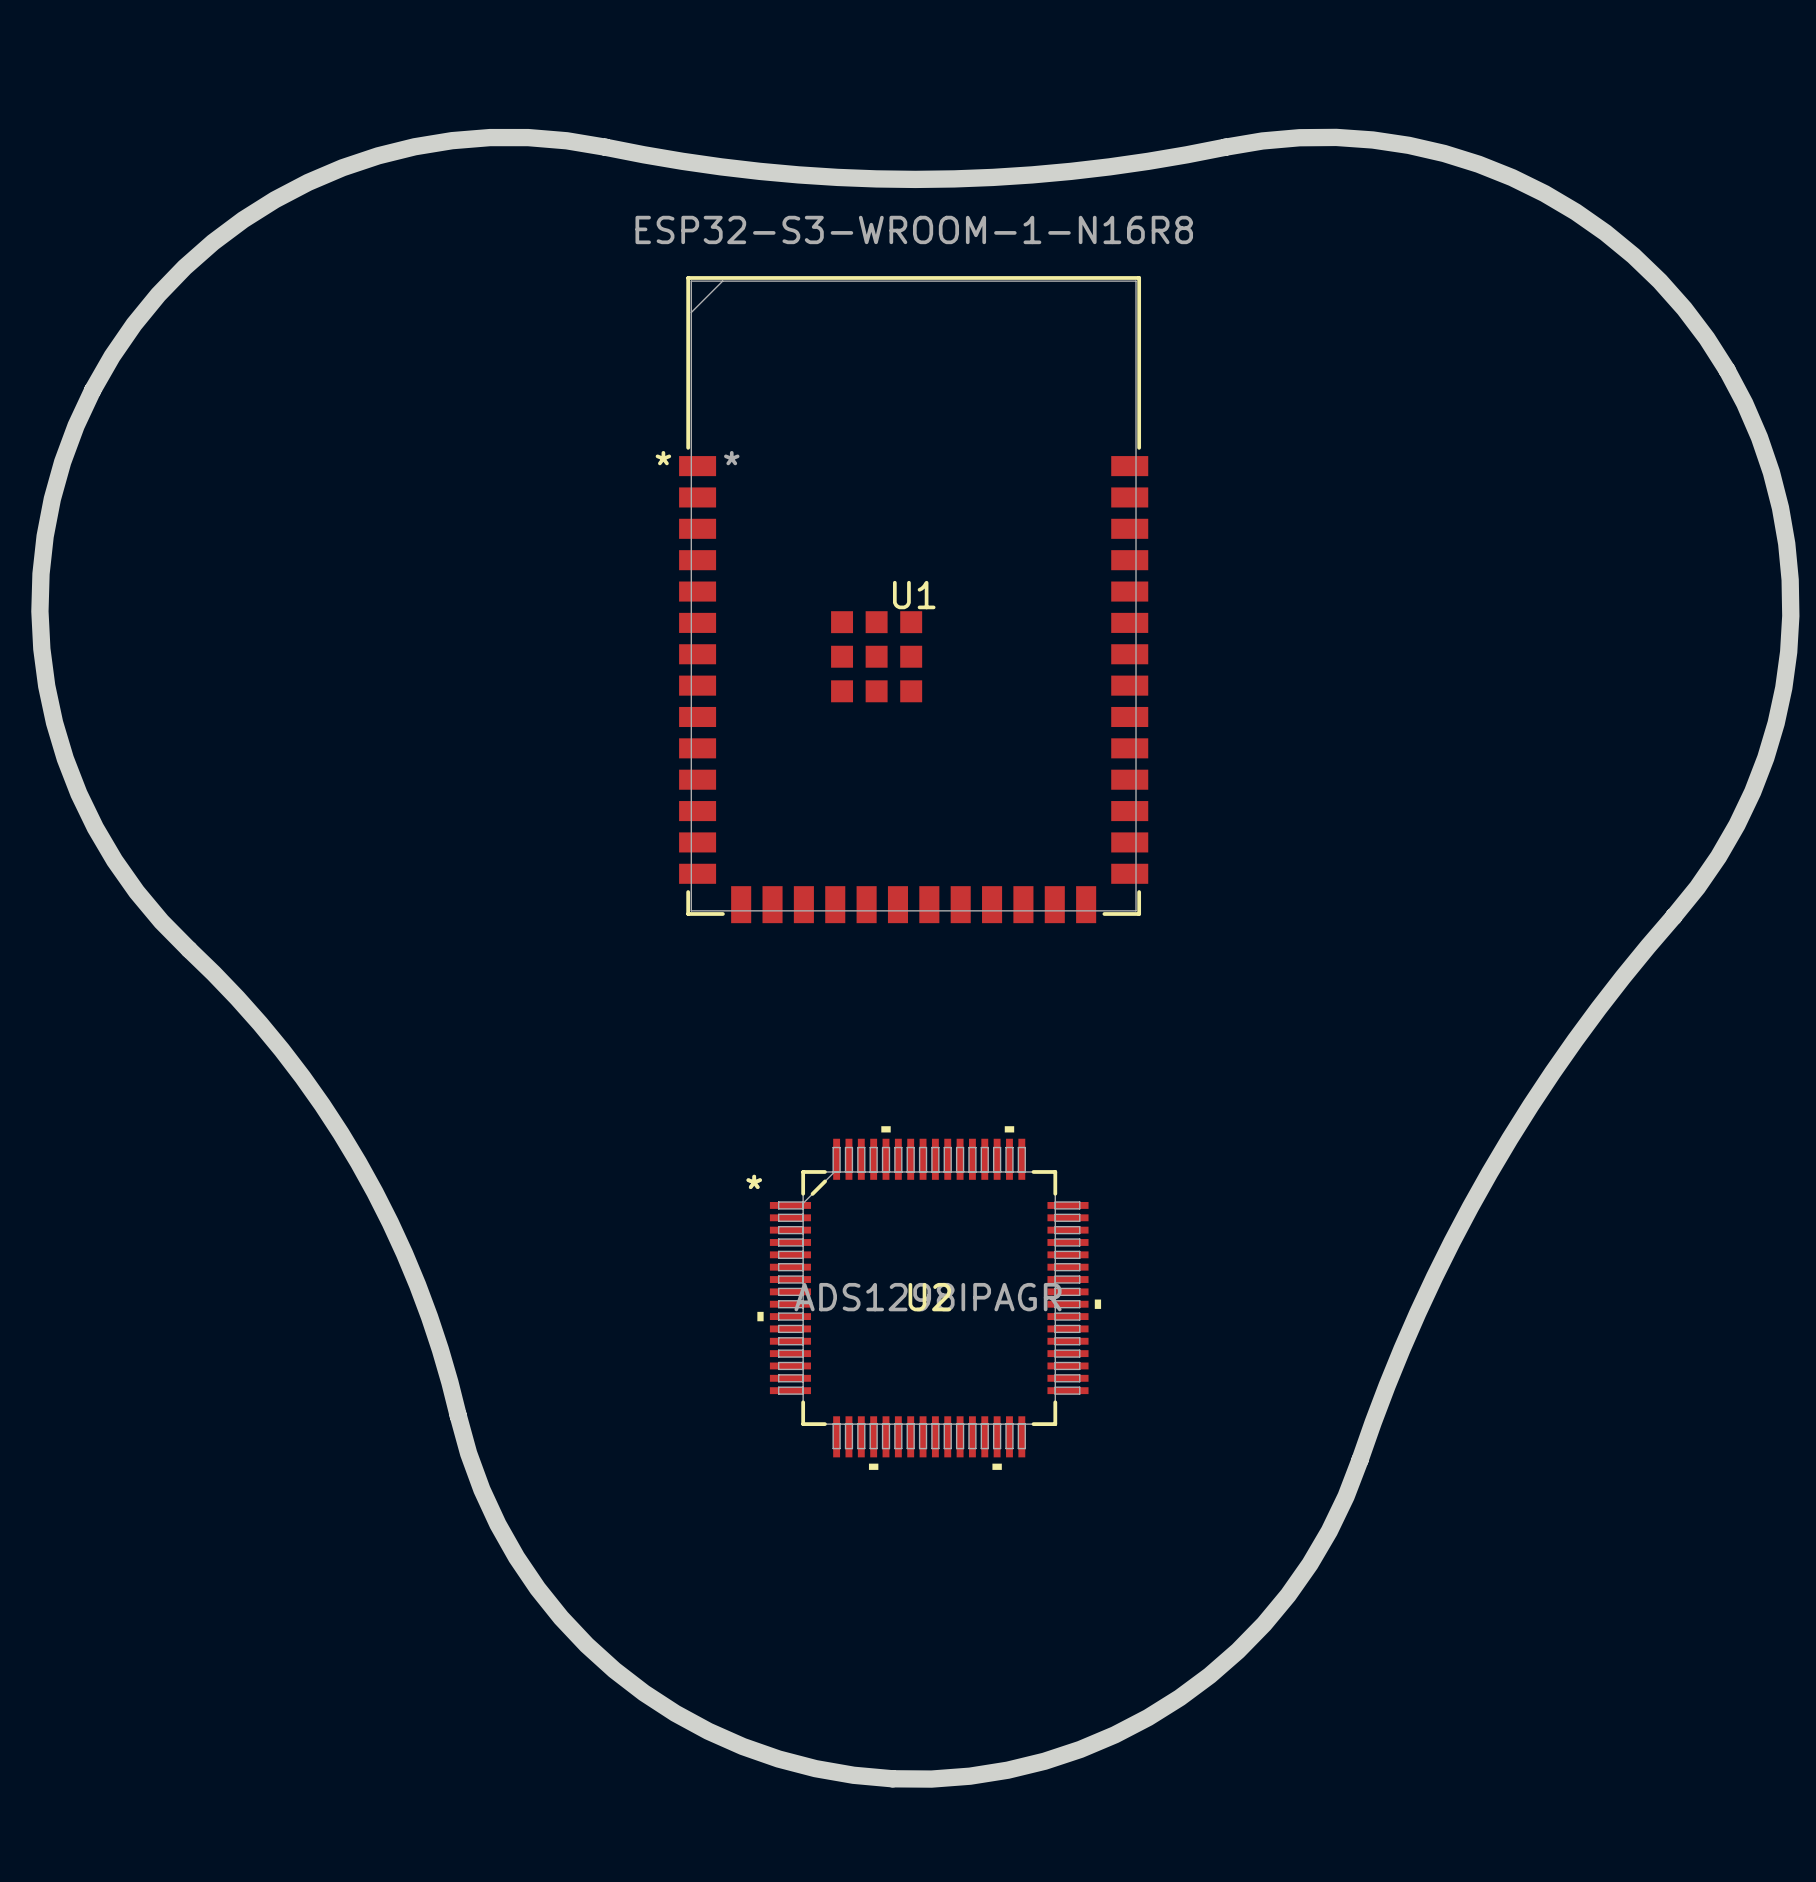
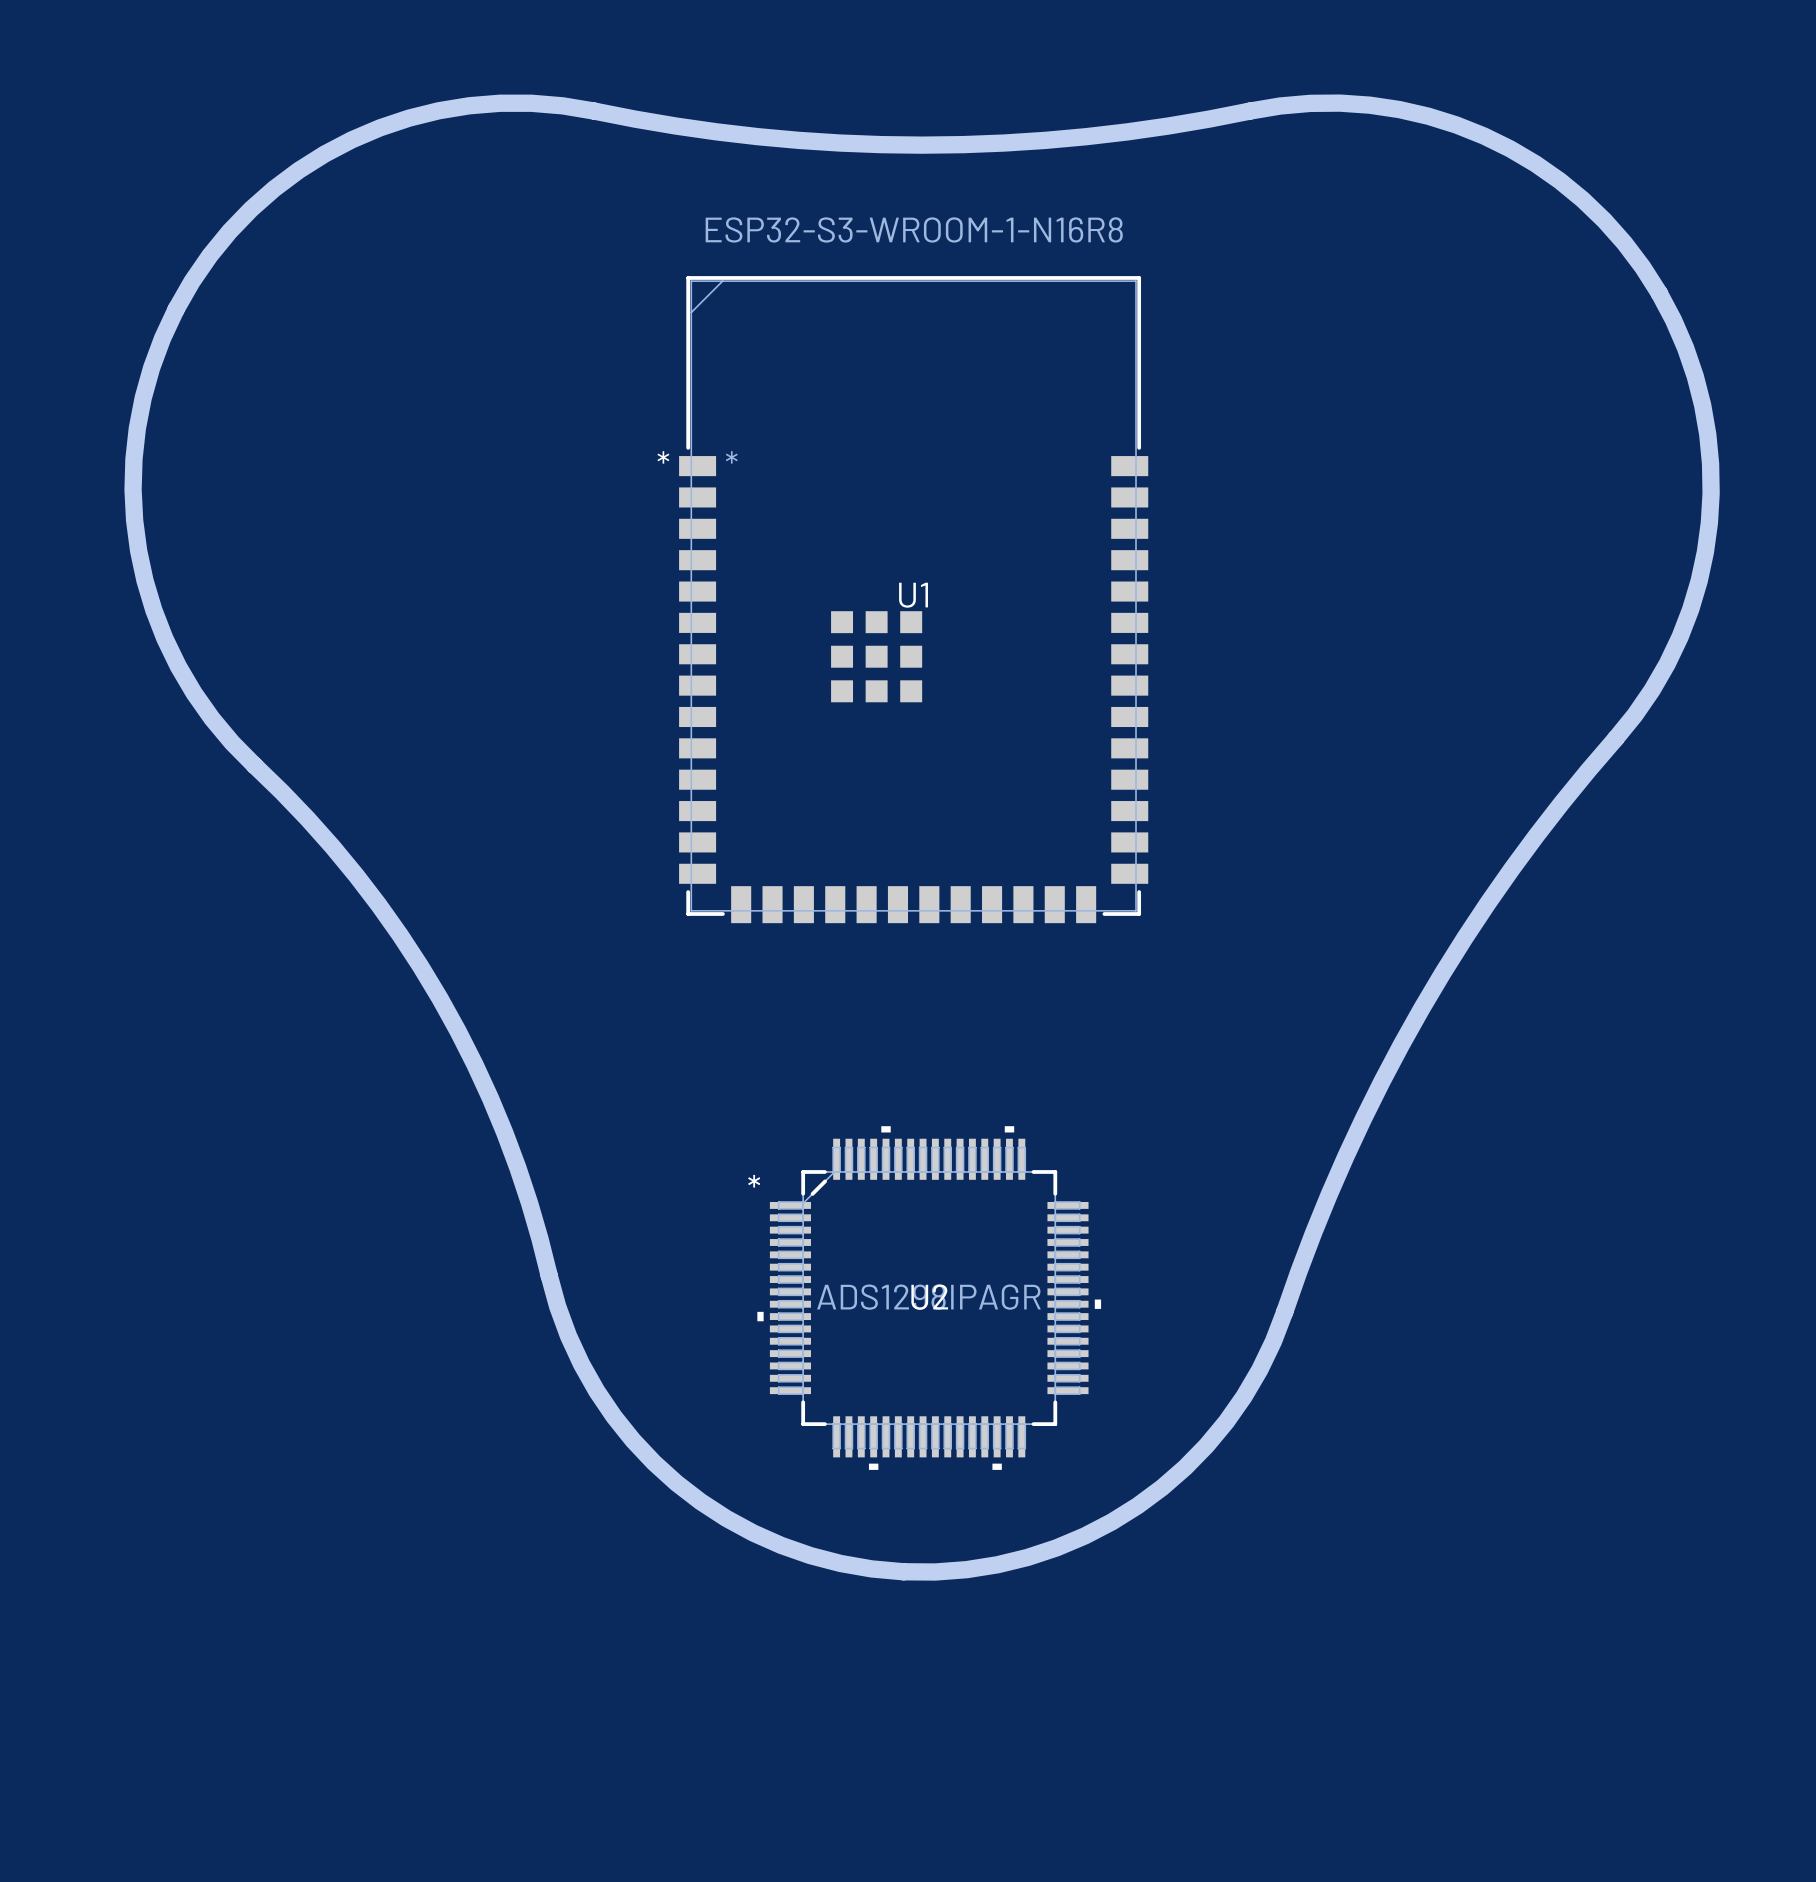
board edge: (605, 147) (682, 161) (759, 171) (837, 177) (915, 179) (993, 177) (1070, 171) (1148, 161) (1262, 140) (1299, 137) (1372, 139) (1444, 153) (1512, 177) (1575, 211) (1633, 255) (1659, 281) (1706, 338) (1727, 370) (1744, 403) (1771, 472) (1786, 543) (1790, 579) (1788, 652) (1776, 723) (1765, 757) (1736, 824) (1697, 887) (1622, 977) (1575, 1040) (1530, 1105) (1489, 1172) (1452, 1241) (1417, 1312) (1387, 1385) (1346, 1496) (1329, 1531) (1310, 1564) (1288, 1595) (1264, 1624) (1237, 1650) (1179, 1697) (1114, 1734) (1080, 1749) (1044, 1761) (1007, 1770) (970, 1776) (931, 1779) (892, 1778) (853, 1775) (815, 1768) (778, 1759) (742, 1746) (708, 1731) (644, 1692) (586, 1645) (537, 1588) (516, 1557) (497, 1524) (481, 1489) (468, 1453) (440, 1349) (417, 1285) (390, 1222) (358, 1162) (322, 1104) (281, 1050) (237, 998) (161, 921) (136, 891) (114, 860) (95, 827) (78, 793) (65, 758) (54, 722) (41, 648) (39, 611) (41, 573) (45, 536) (52, 498) (62, 462) (76, 425) (92, 390) (112, 356) (134, 324) (158, 294) (184, 267) (213, 242) (243, 219) (308, 182) (378, 155) (414, 146) (452, 140) (489, 137) (528, 137) (566, 140) (605, 147) -> (594, 111) (562, 105) (500, 103) (469, 105) (409, 118) (351, 139) (298, 170) (251, 209) (229, 231) (191, 281) (176, 309) (162, 338) (143, 398) (137, 428) (133, 489) (138, 550) (153, 609) (178, 666) (212, 718) (232, 742) (307, 818) (356, 875) (400, 935) (440, 998) (474, 1064) (504, 1132) (529, 1203) (557, 1306) (568, 1335) (596, 1391) (633, 1440) (676, 1483) (726, 1518) (781, 1545) (810, 1555) (871, 1568) (903, 1571) (966, 1569) (1027, 1557) (1084, 1535) (1137, 1505) (1185, 1467) (1226, 1421) (1259, 1369) (1273, 1341) (1313, 1233) (1345, 1156) (1381, 1081) (1421, 1008) (1464, 937) (1511, 869) (1562, 802) (1634, 714) (1667, 663) (1690, 609) (1699, 580) (1709, 522) (1710, 464) (1707, 434) (1695, 376) (1673, 320) (1659, 292) (1642, 267) (1604, 220) (1582, 199) (1535, 163) (1483, 135) (1428, 116) (1370, 105) (1310, 103) (1280, 106) (1168, 126) (1086, 136) (1004, 143) (922, 145) (839, 143) (757, 136) (675, 126) (594, 111)

